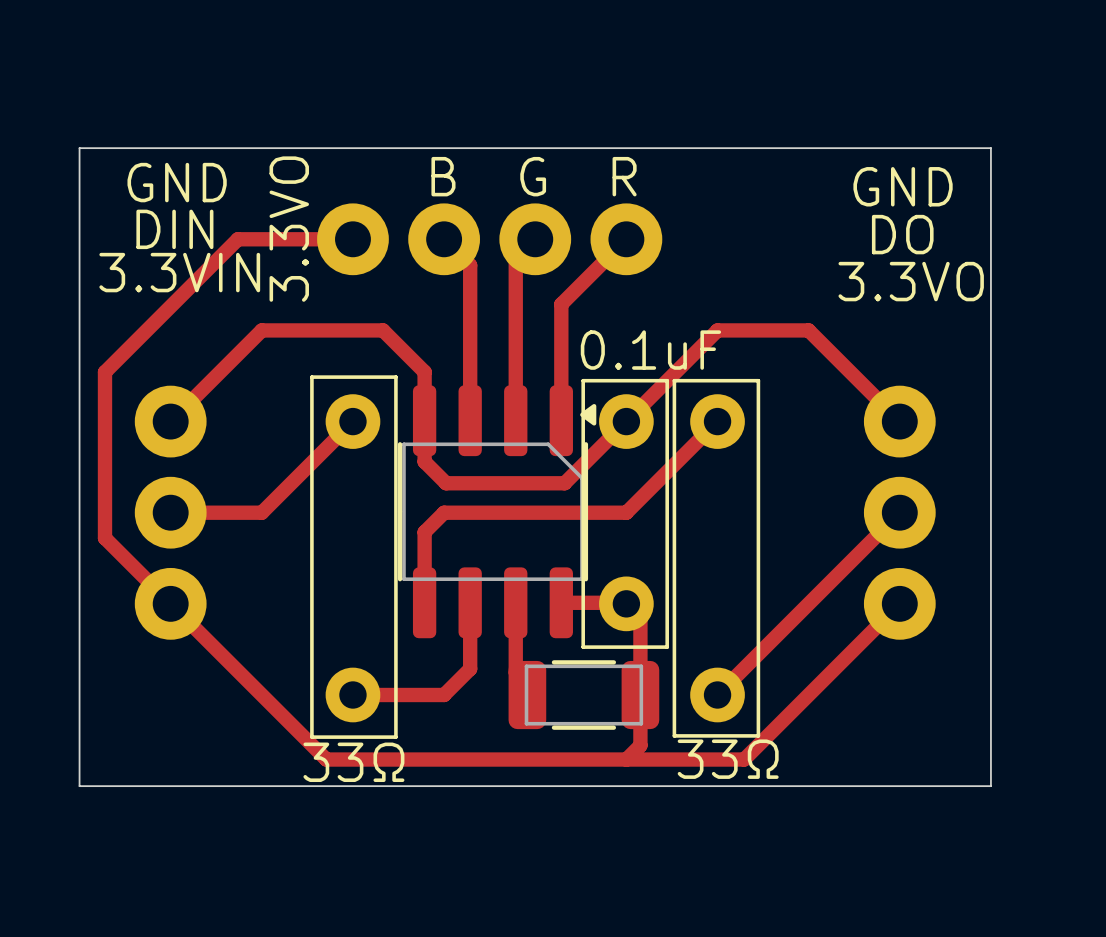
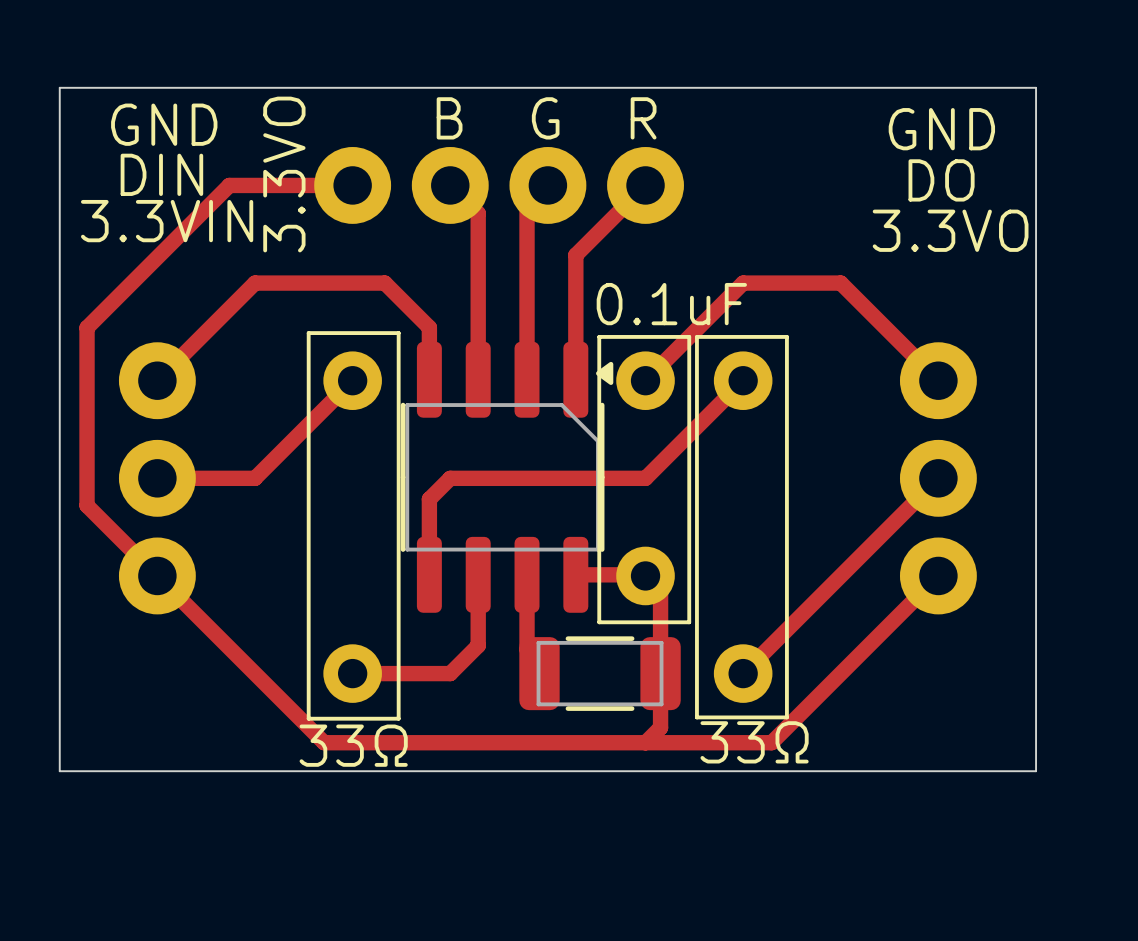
track: (424, 420) (424, 461) (446, 483) (564, 483) (626, 421) -> none

